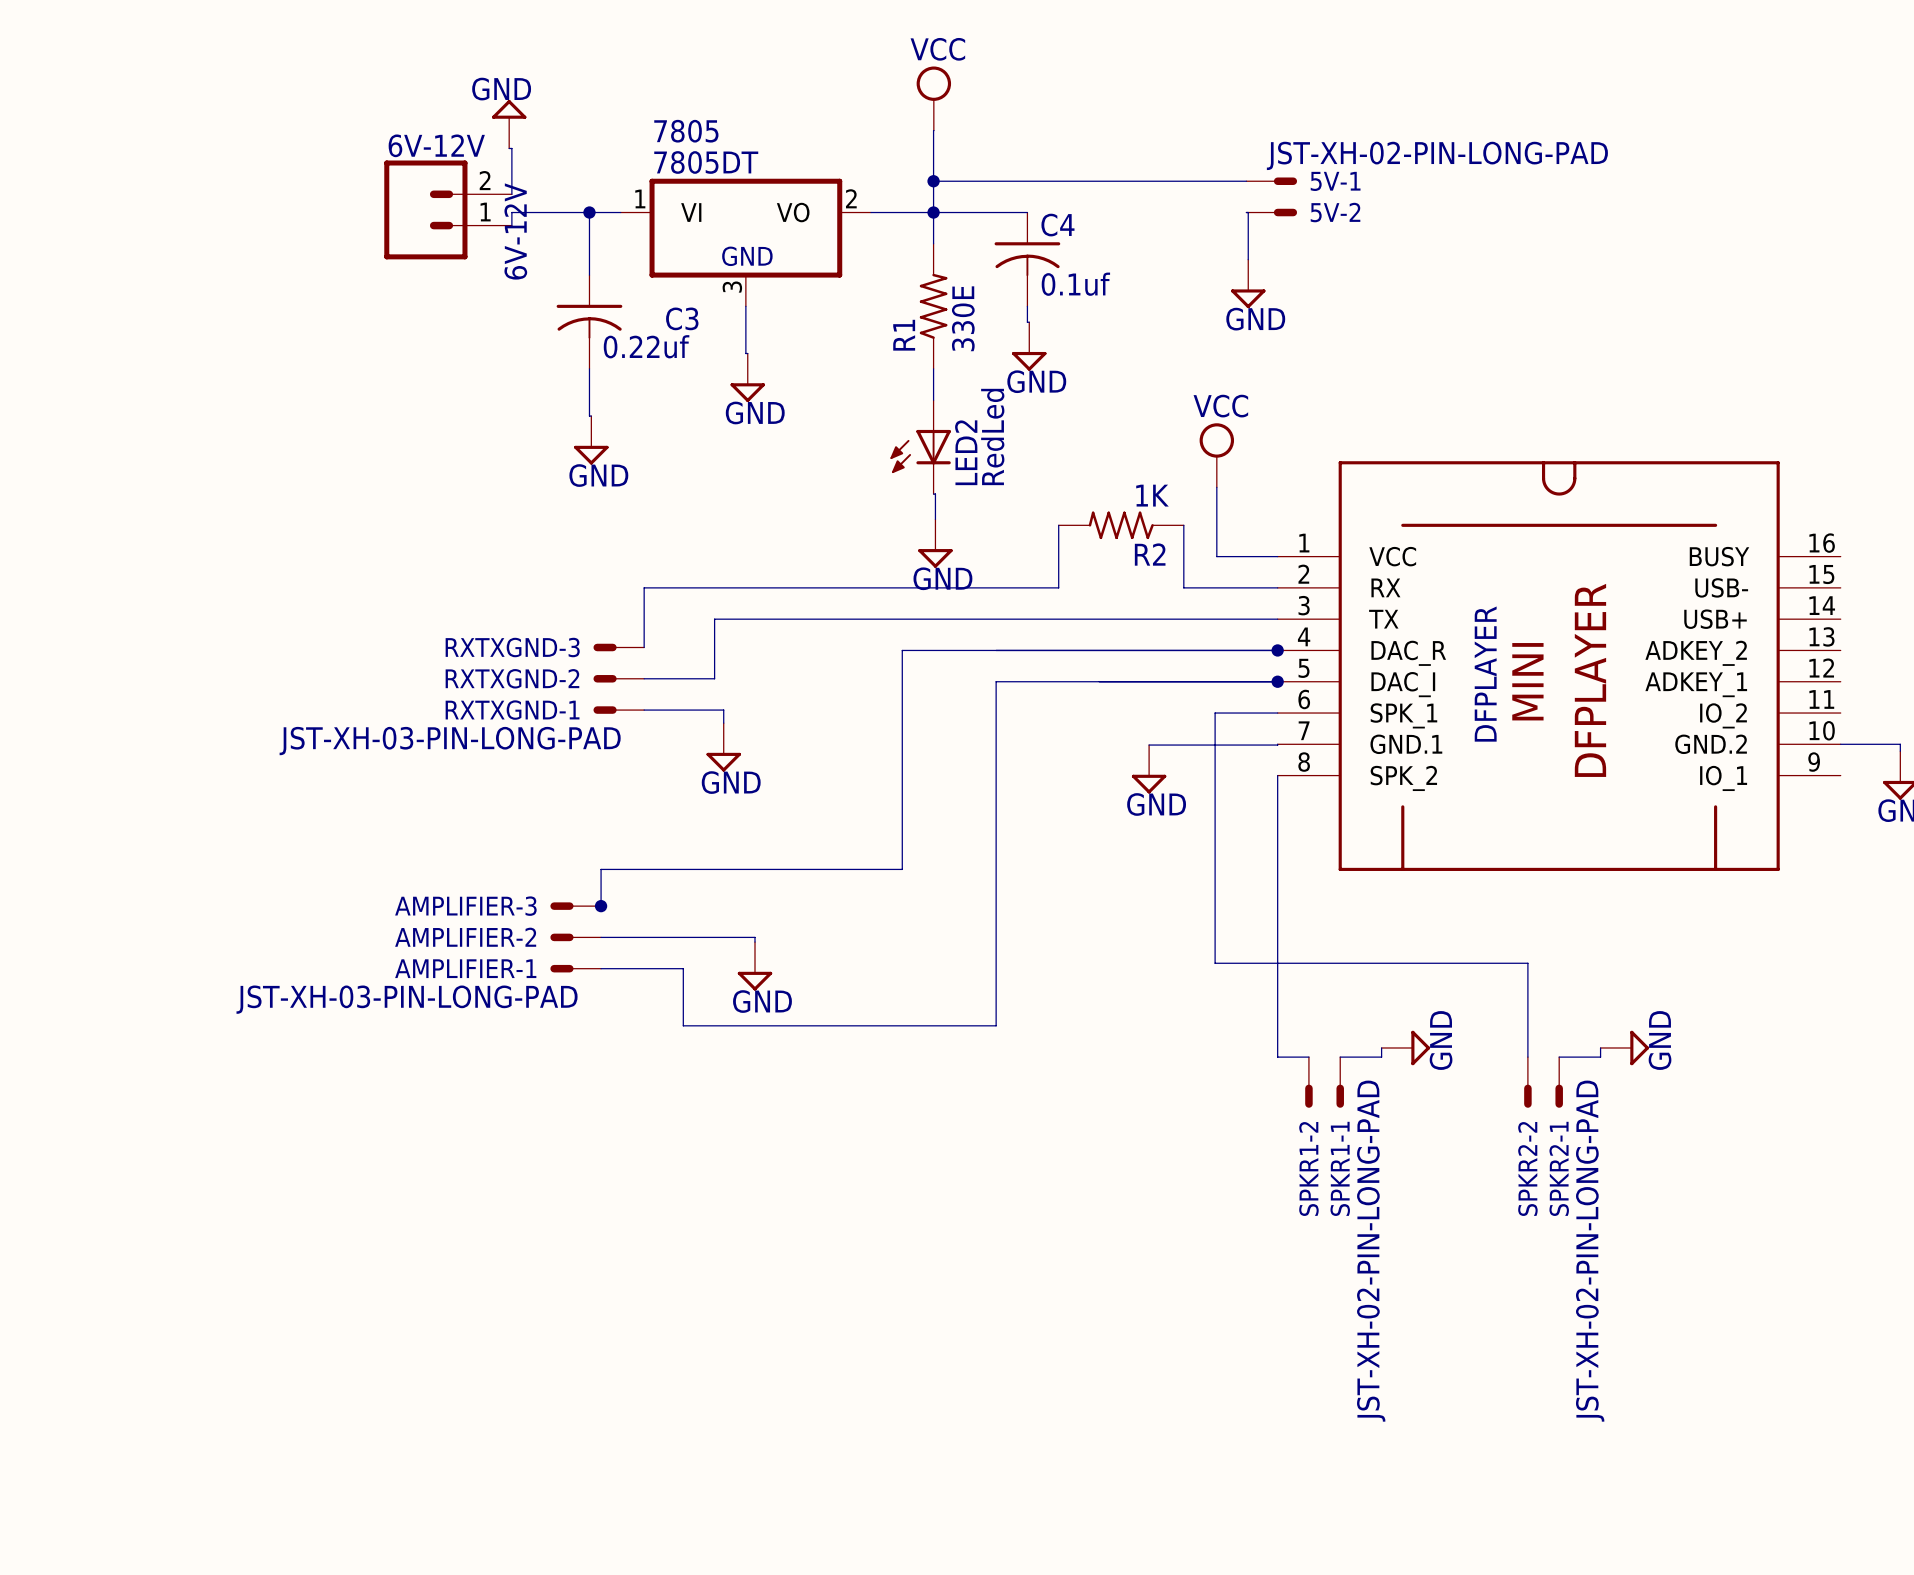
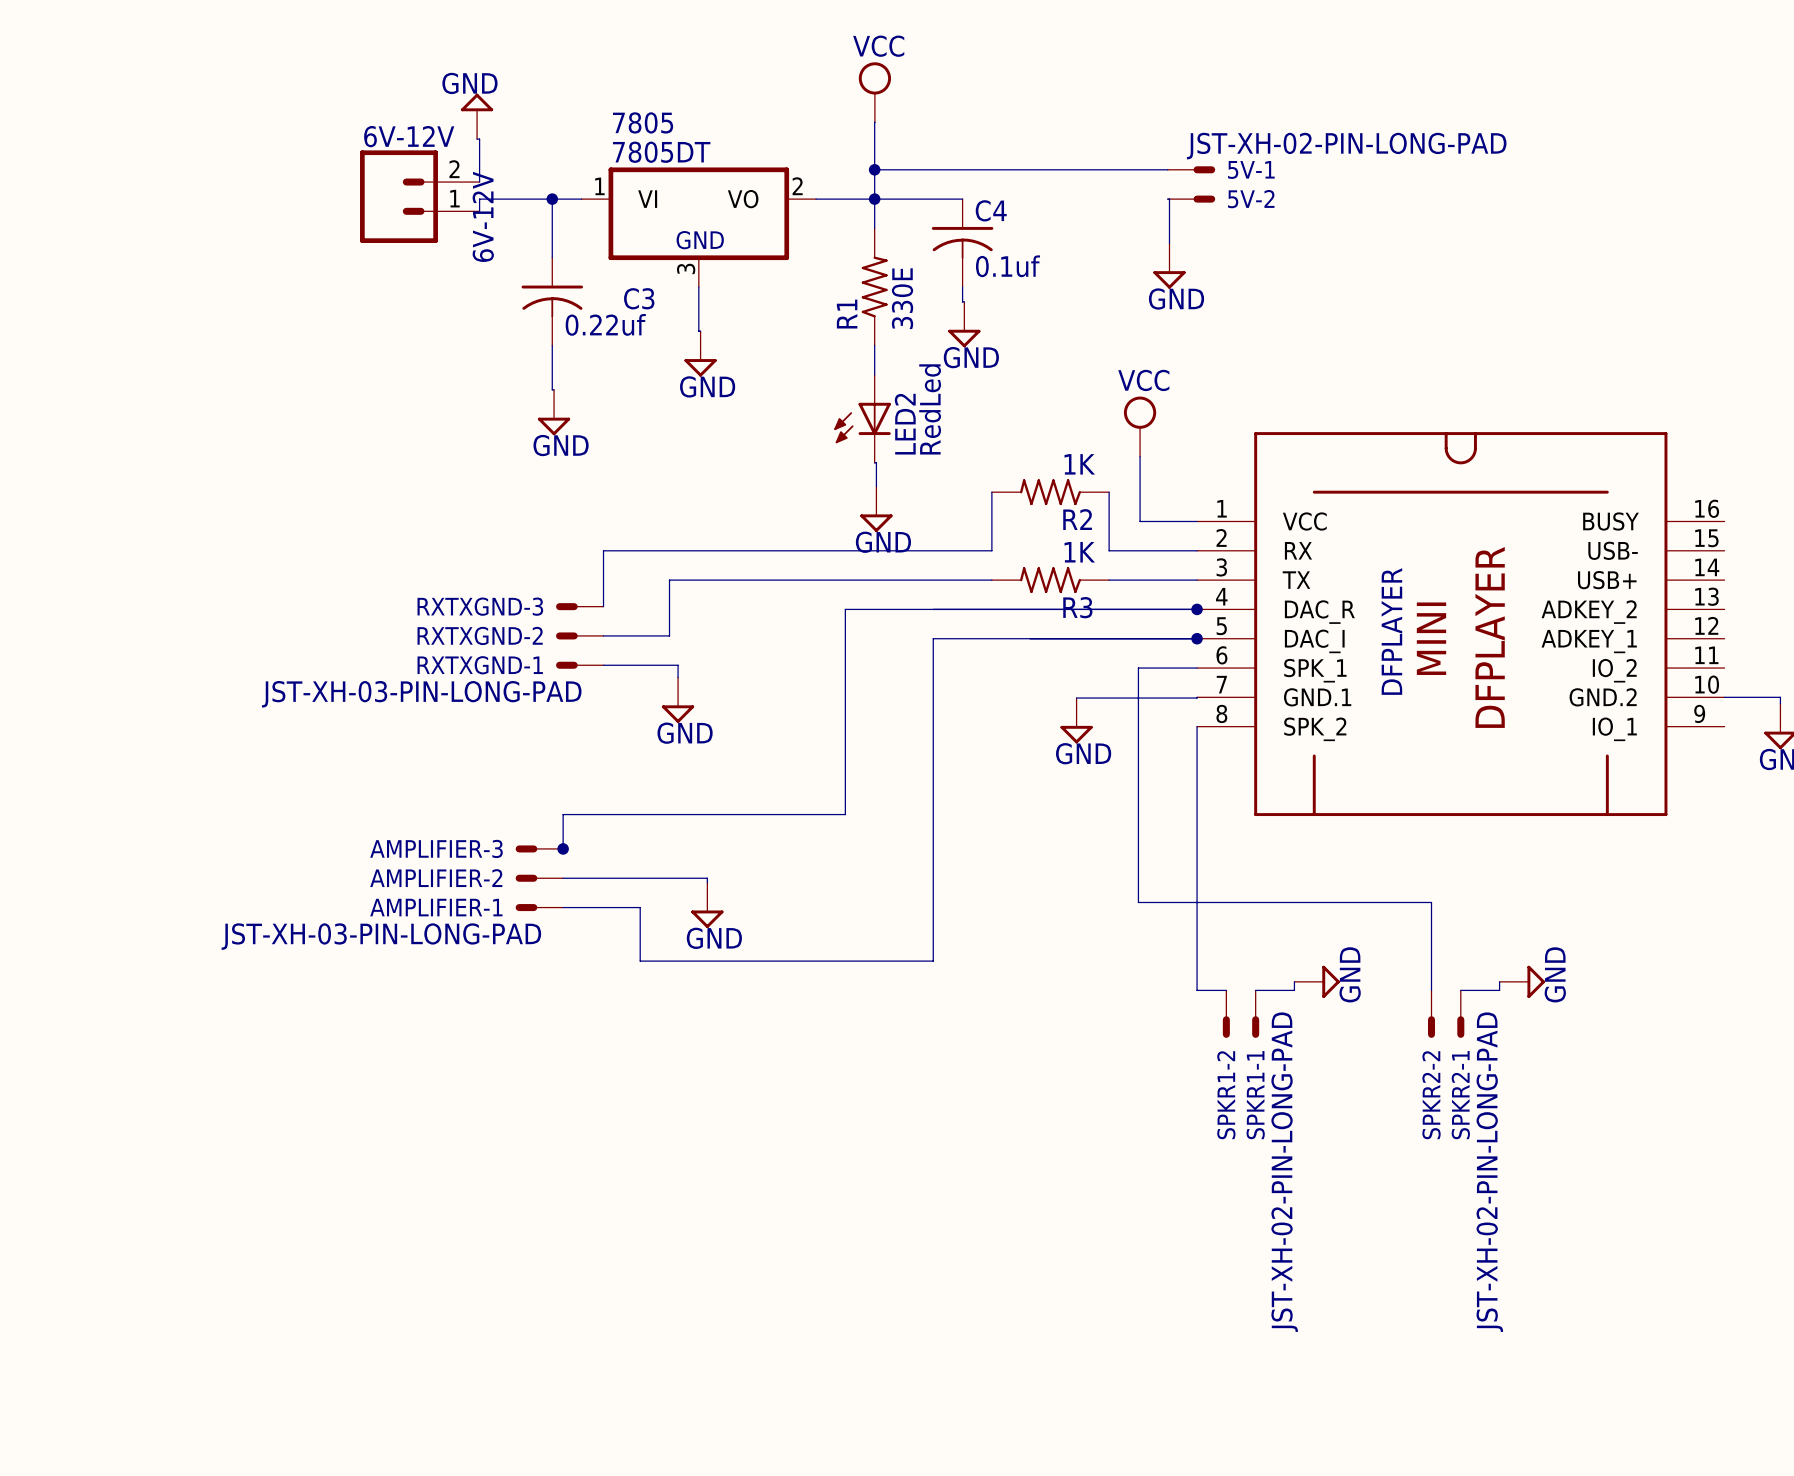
R3: none -> 1K (1050, 580)

